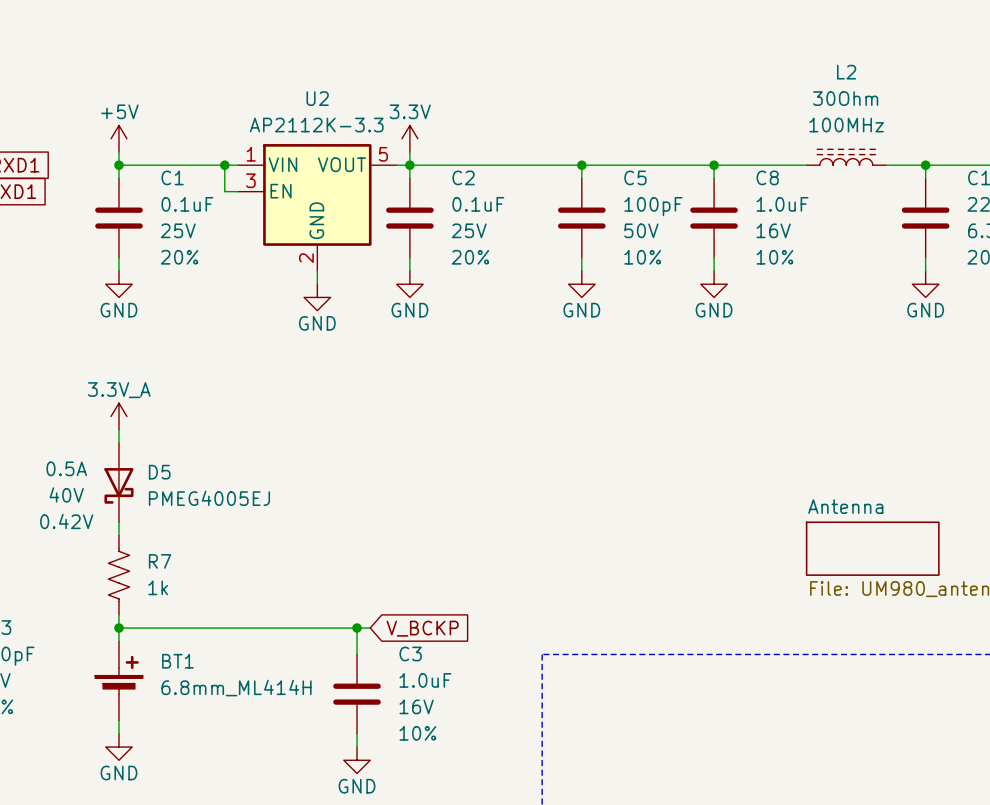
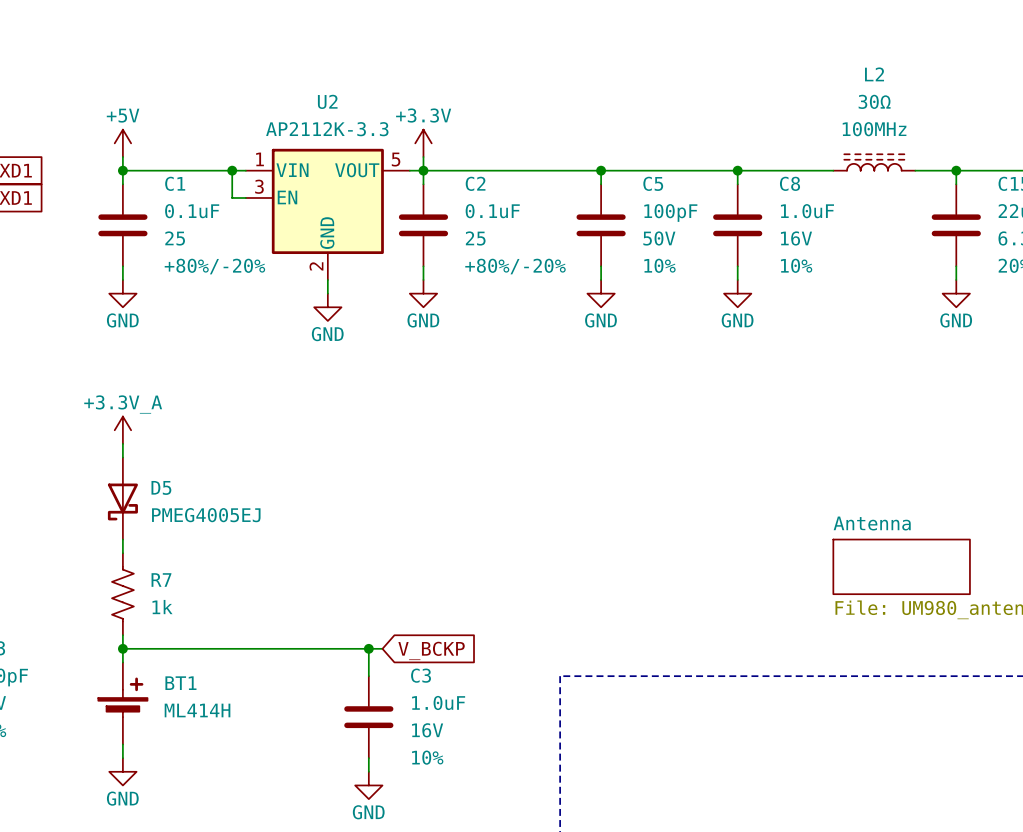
L2 value: 30Ohm (845, 98) -> 30Ω (874, 101)
power symbol: 3.3V (409, 138) -> +3.3V (423, 143)
C1 text: 25V (178, 230) -> 25 (175, 238)
C2 text: 25V (469, 230) -> 25 (475, 238)
C1 text: 20% (179, 257) -> +80%/-20% (214, 266)
C2 text: 20% (470, 257) -> +80%/-20% (515, 266)
power symbol: 3.3V_A (118, 416) -> +3.3V_A (122, 430)
D5 text: 0.5A (66, 468) -> none
D5 text: 40V (66, 494) -> none
D5 text: 0.42V (66, 521) -> none
BT1 value: 6.8mm_ML414H (236, 688) -> ML414H (197, 710)

